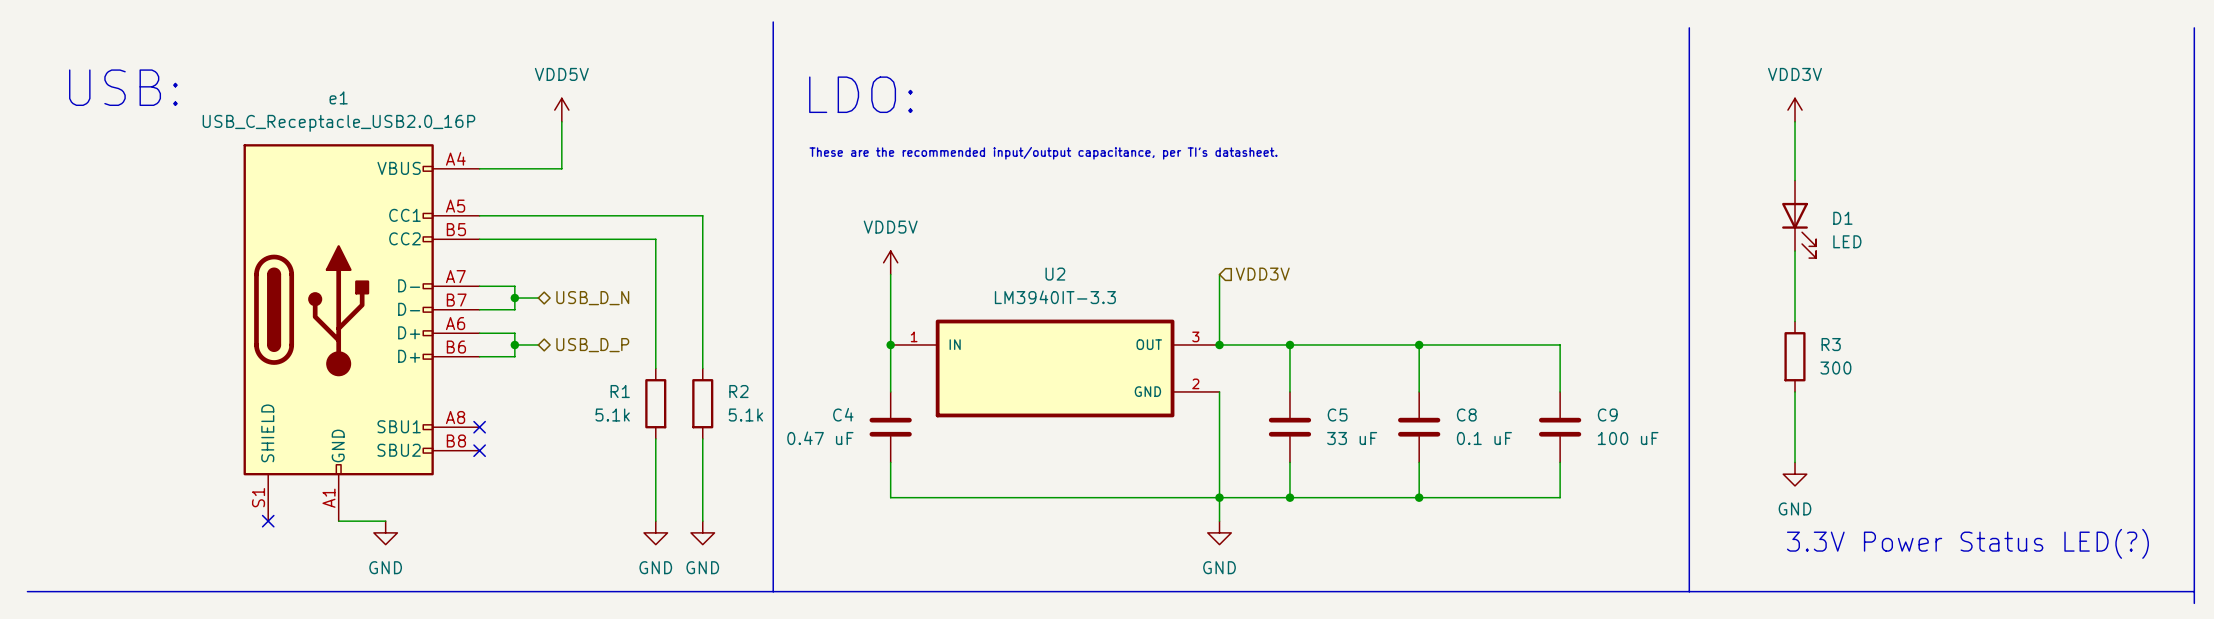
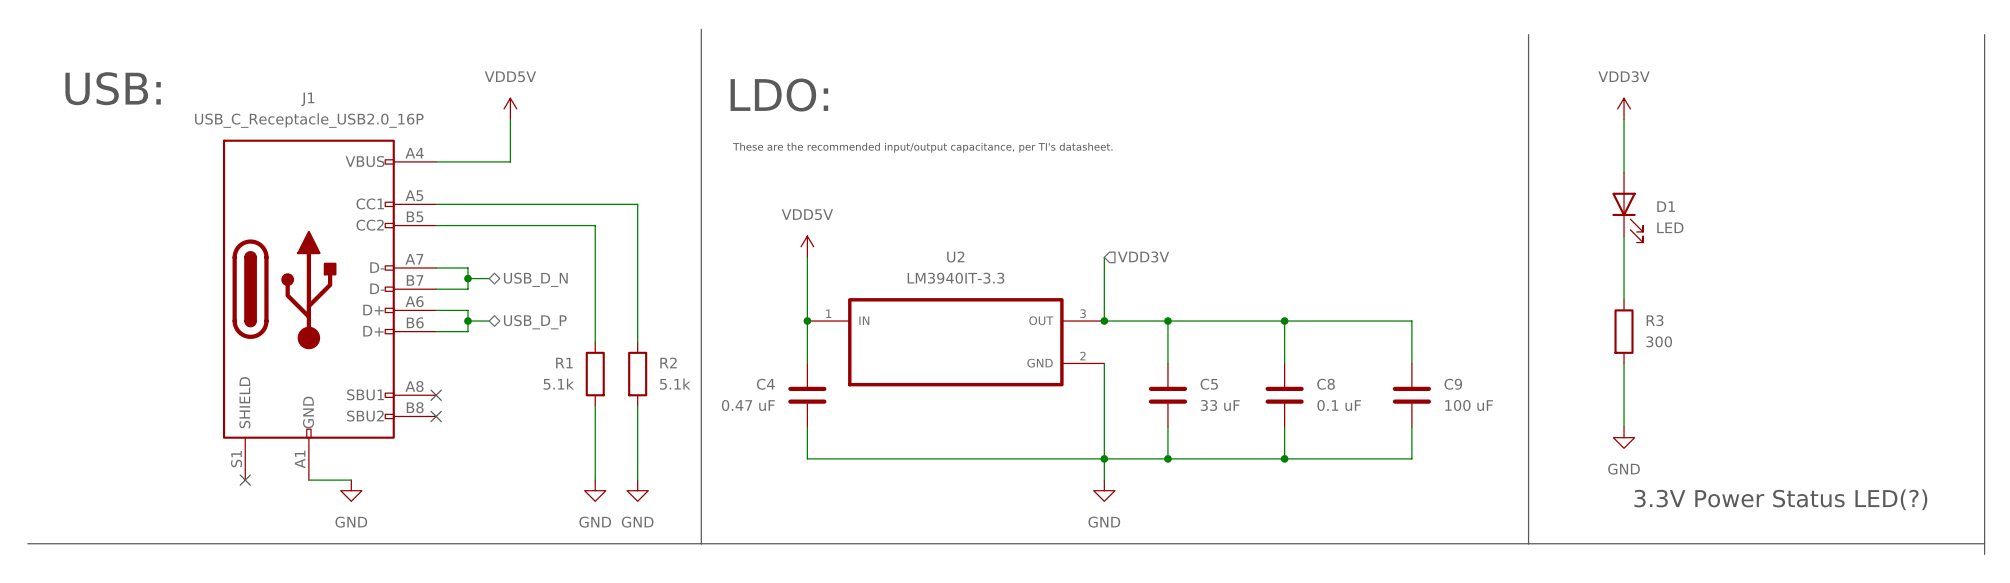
e1 name: e1 (338, 97) -> J1 (307, 99)

